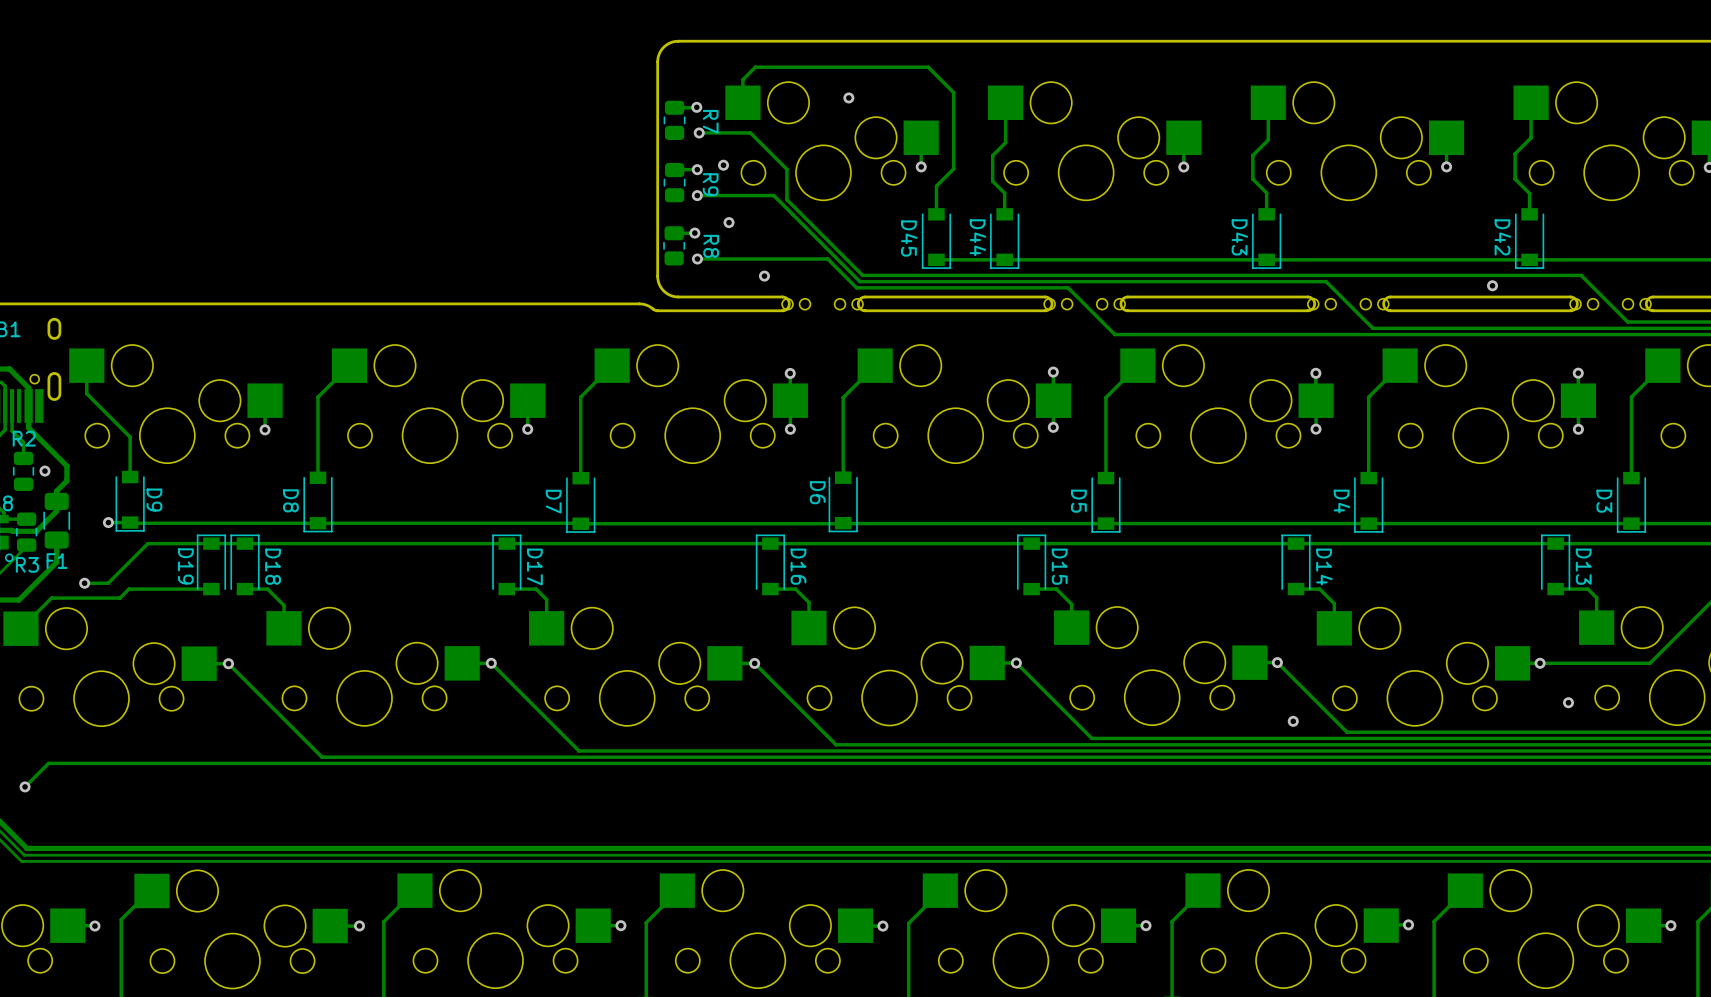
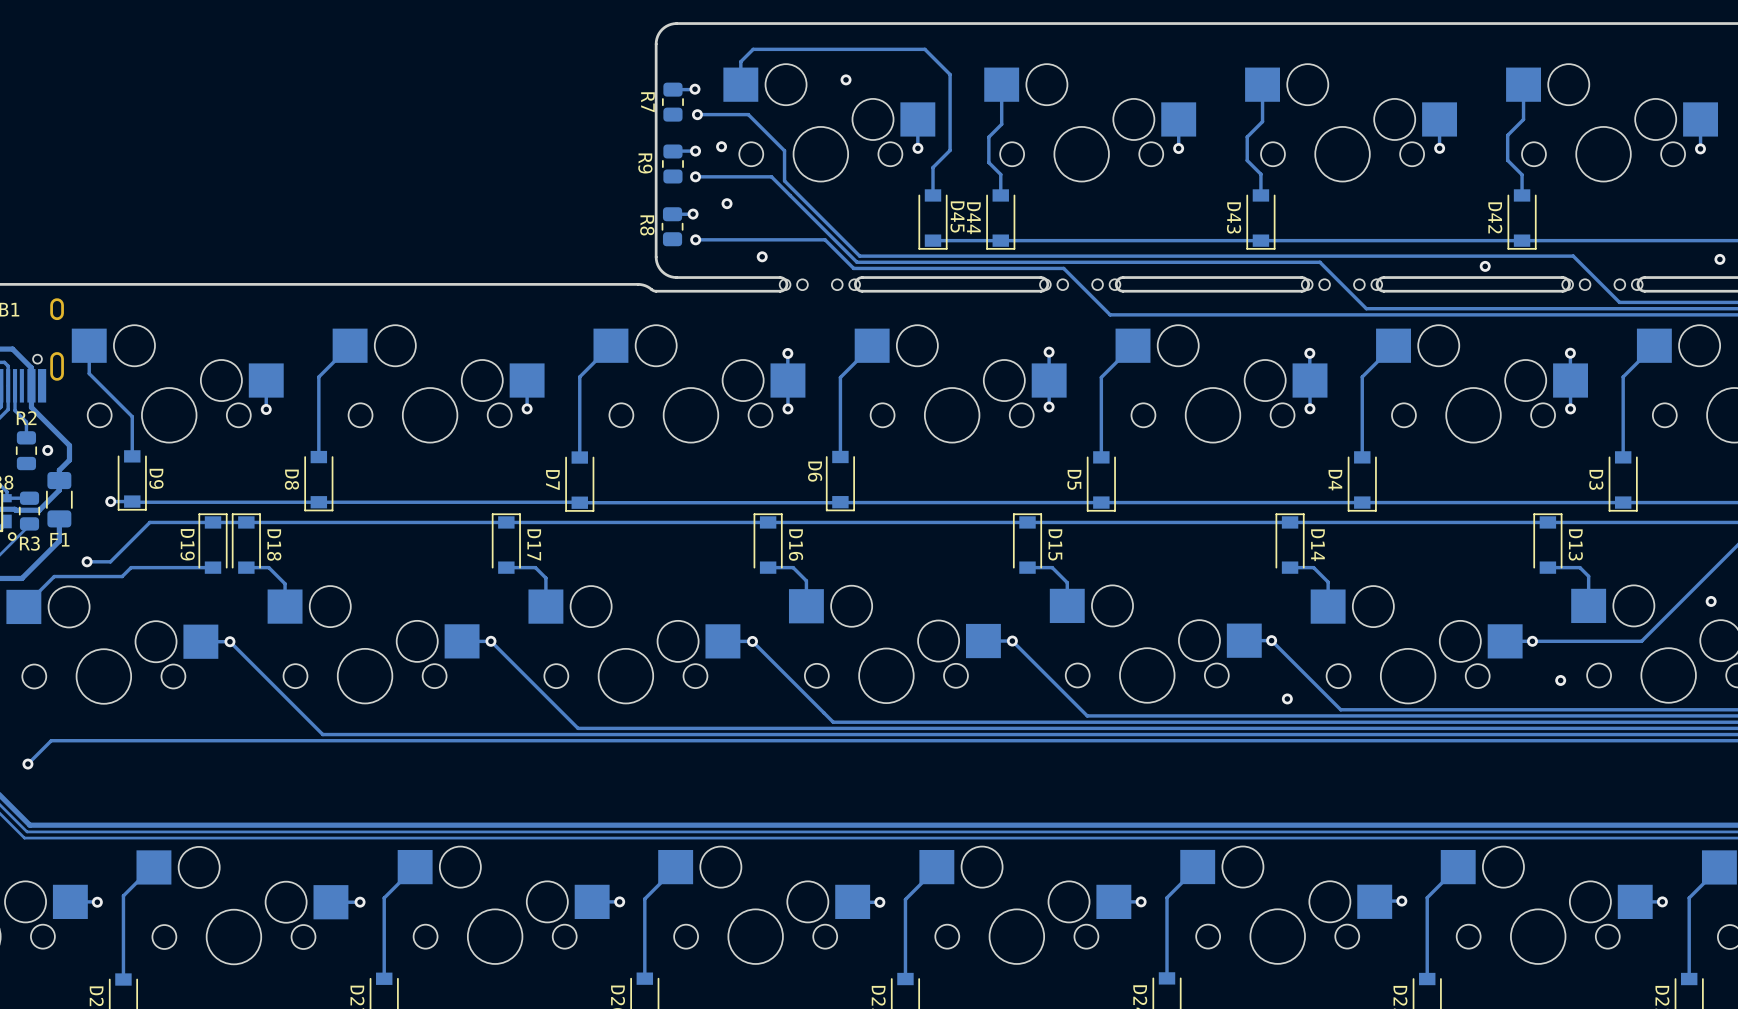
R7 name position: R7 (710, 121) -> R7 (647, 102)
R9 name position: R9 (710, 184) -> R9 (645, 163)
D45 name position: D45 (909, 238) -> D45 (957, 216)
R8 name position: R8 (711, 246) -> R8 (647, 225)

